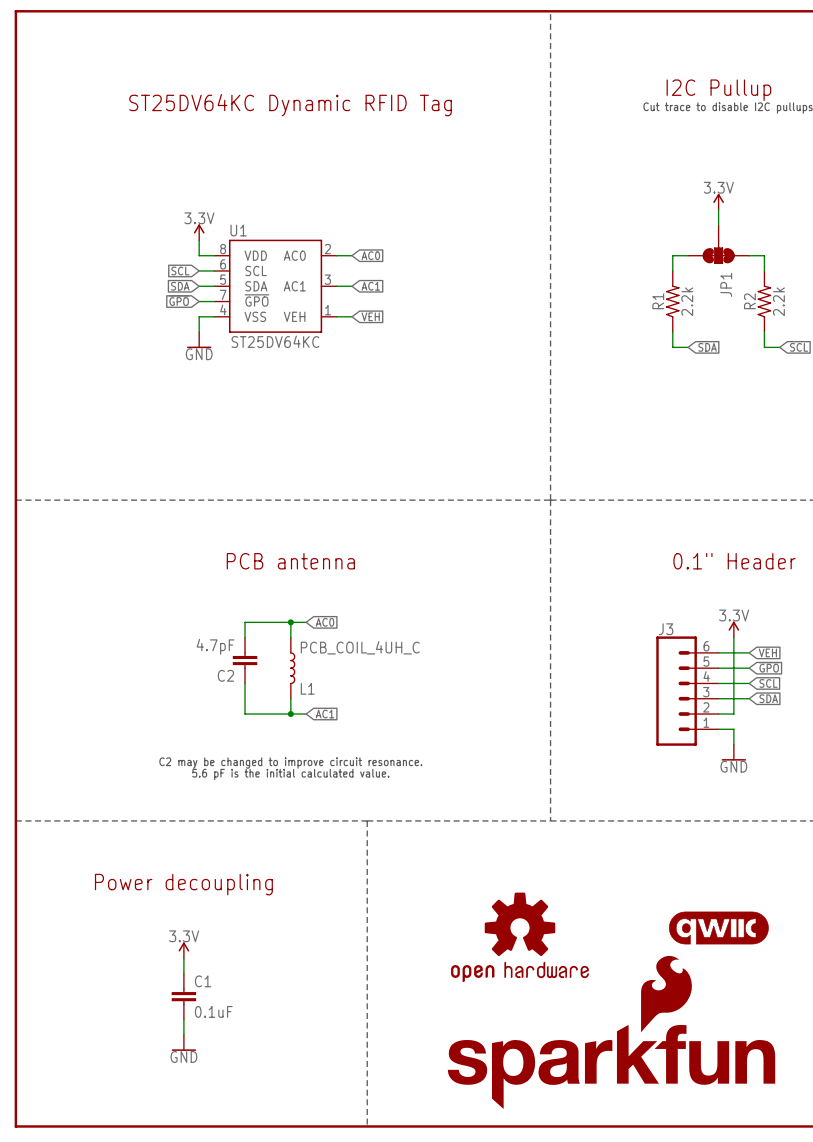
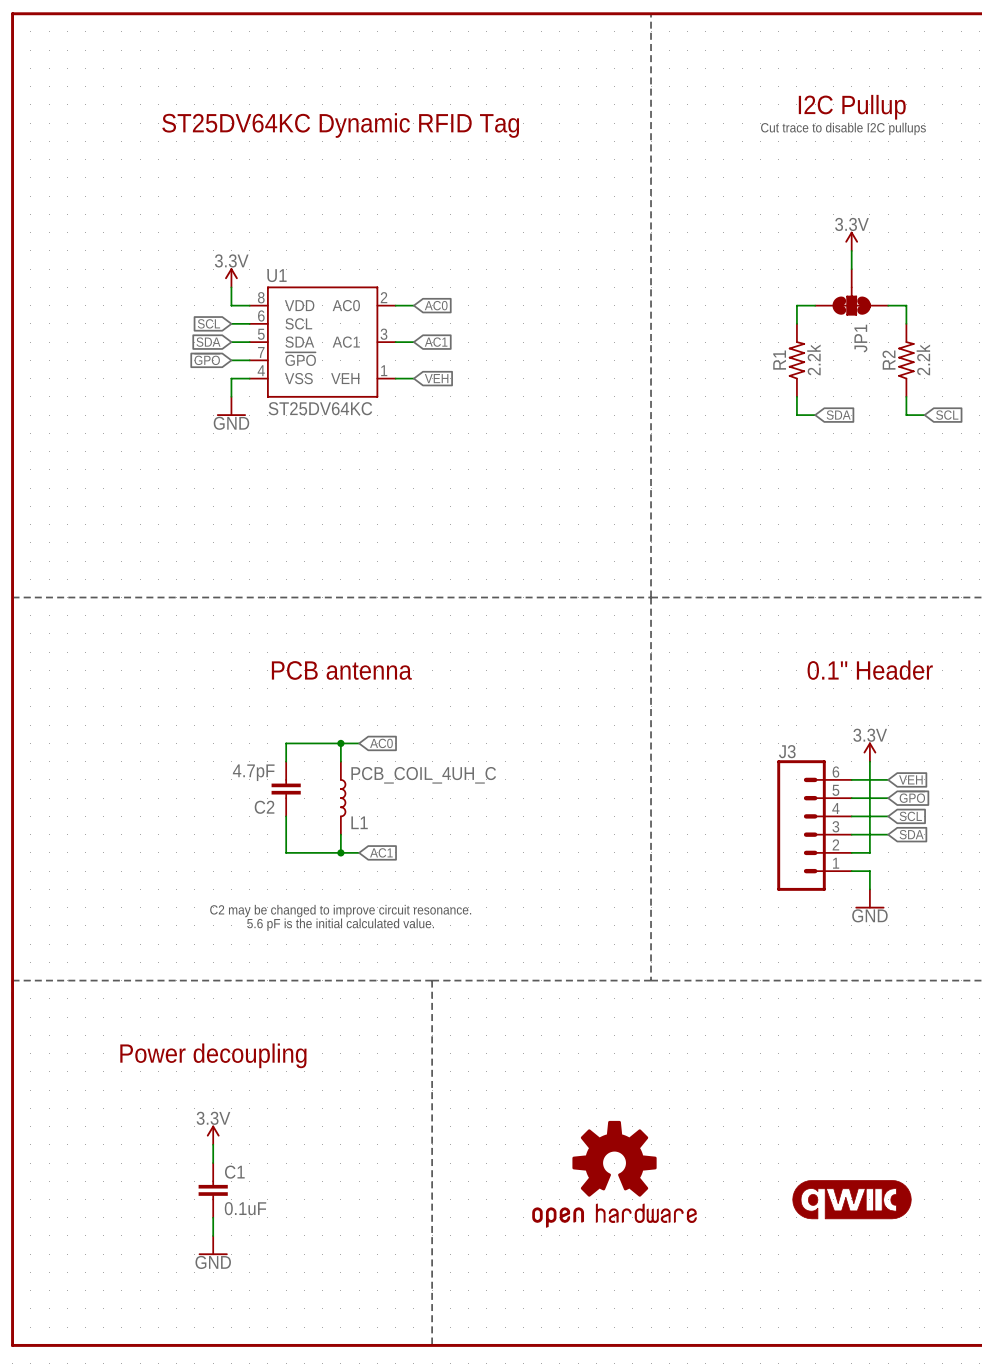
part position: (718, 928) -> (852, 1199)
part position: (519, 937) -> (614, 1174)
part: (611, 1032) -> none

